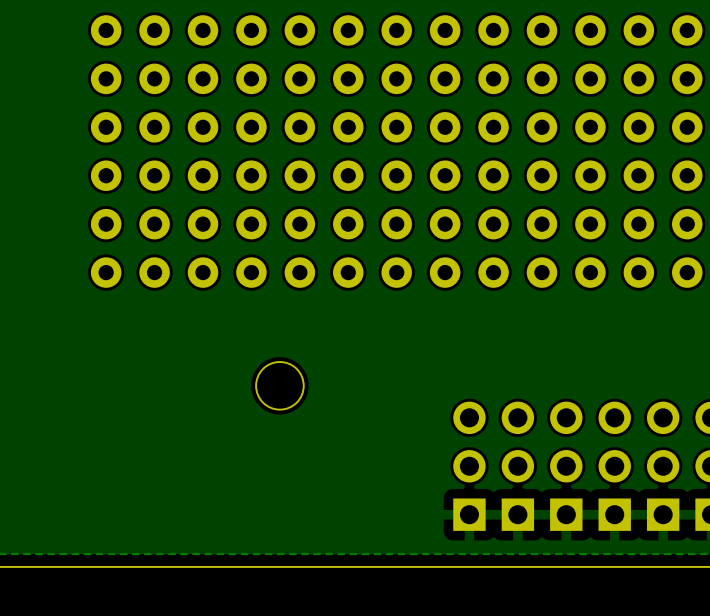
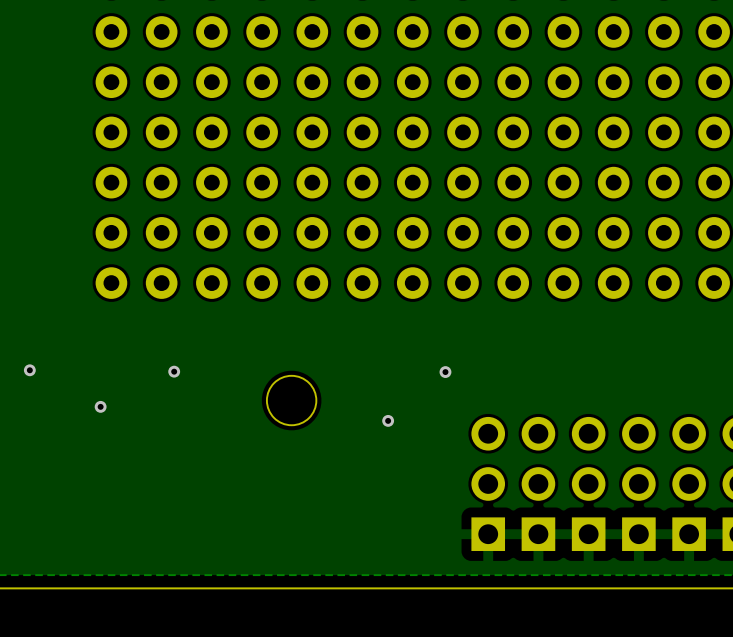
via: none -> (29, 370)
via: none -> (174, 371)
via: none -> (445, 372)
via: none -> (100, 406)
via: none -> (388, 420)

